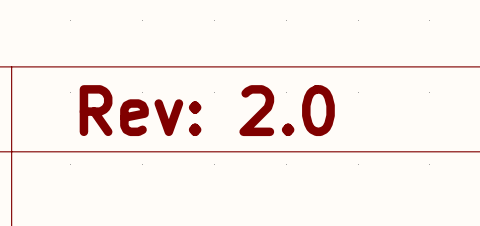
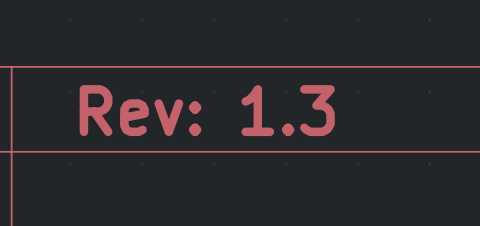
title block: Rev: 2.0 (207, 110) -> Rev: 1.3 (207, 110)

